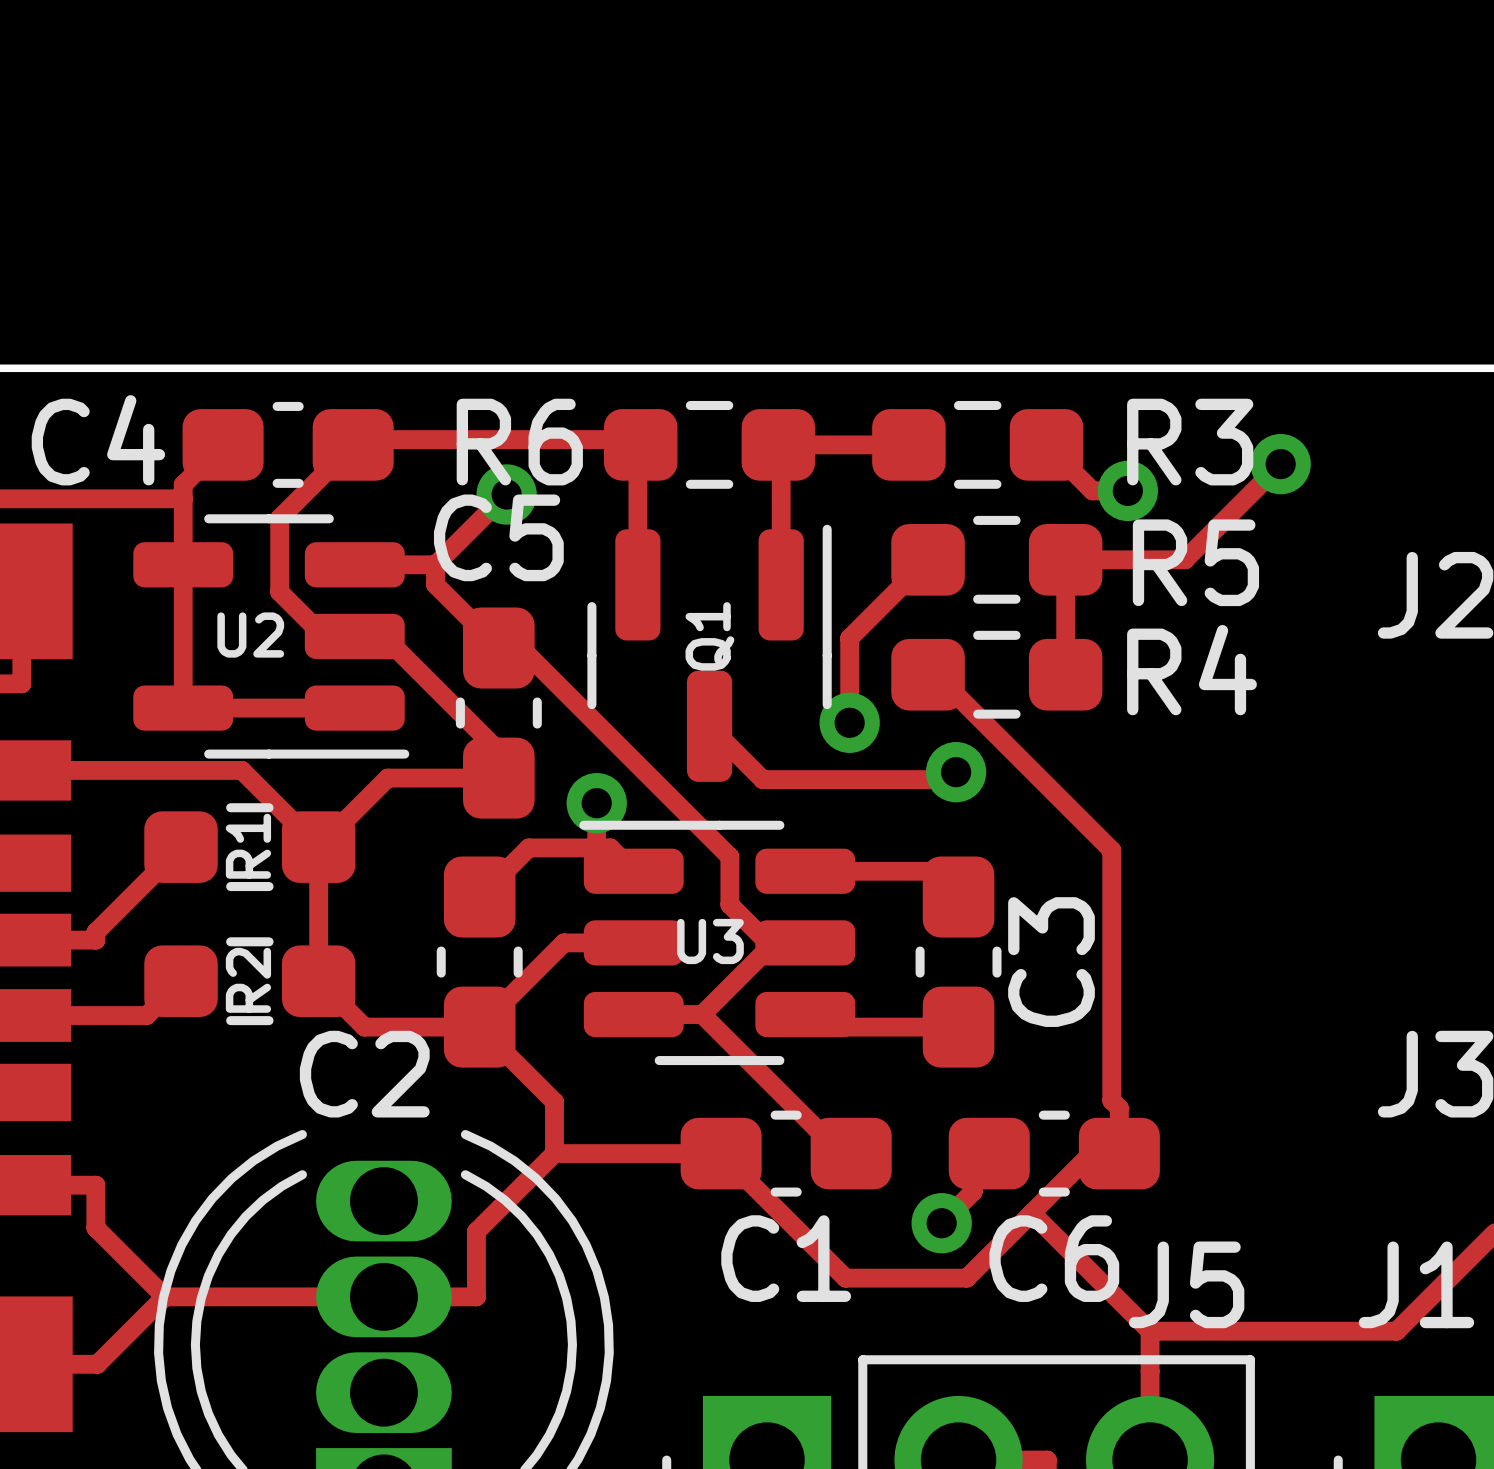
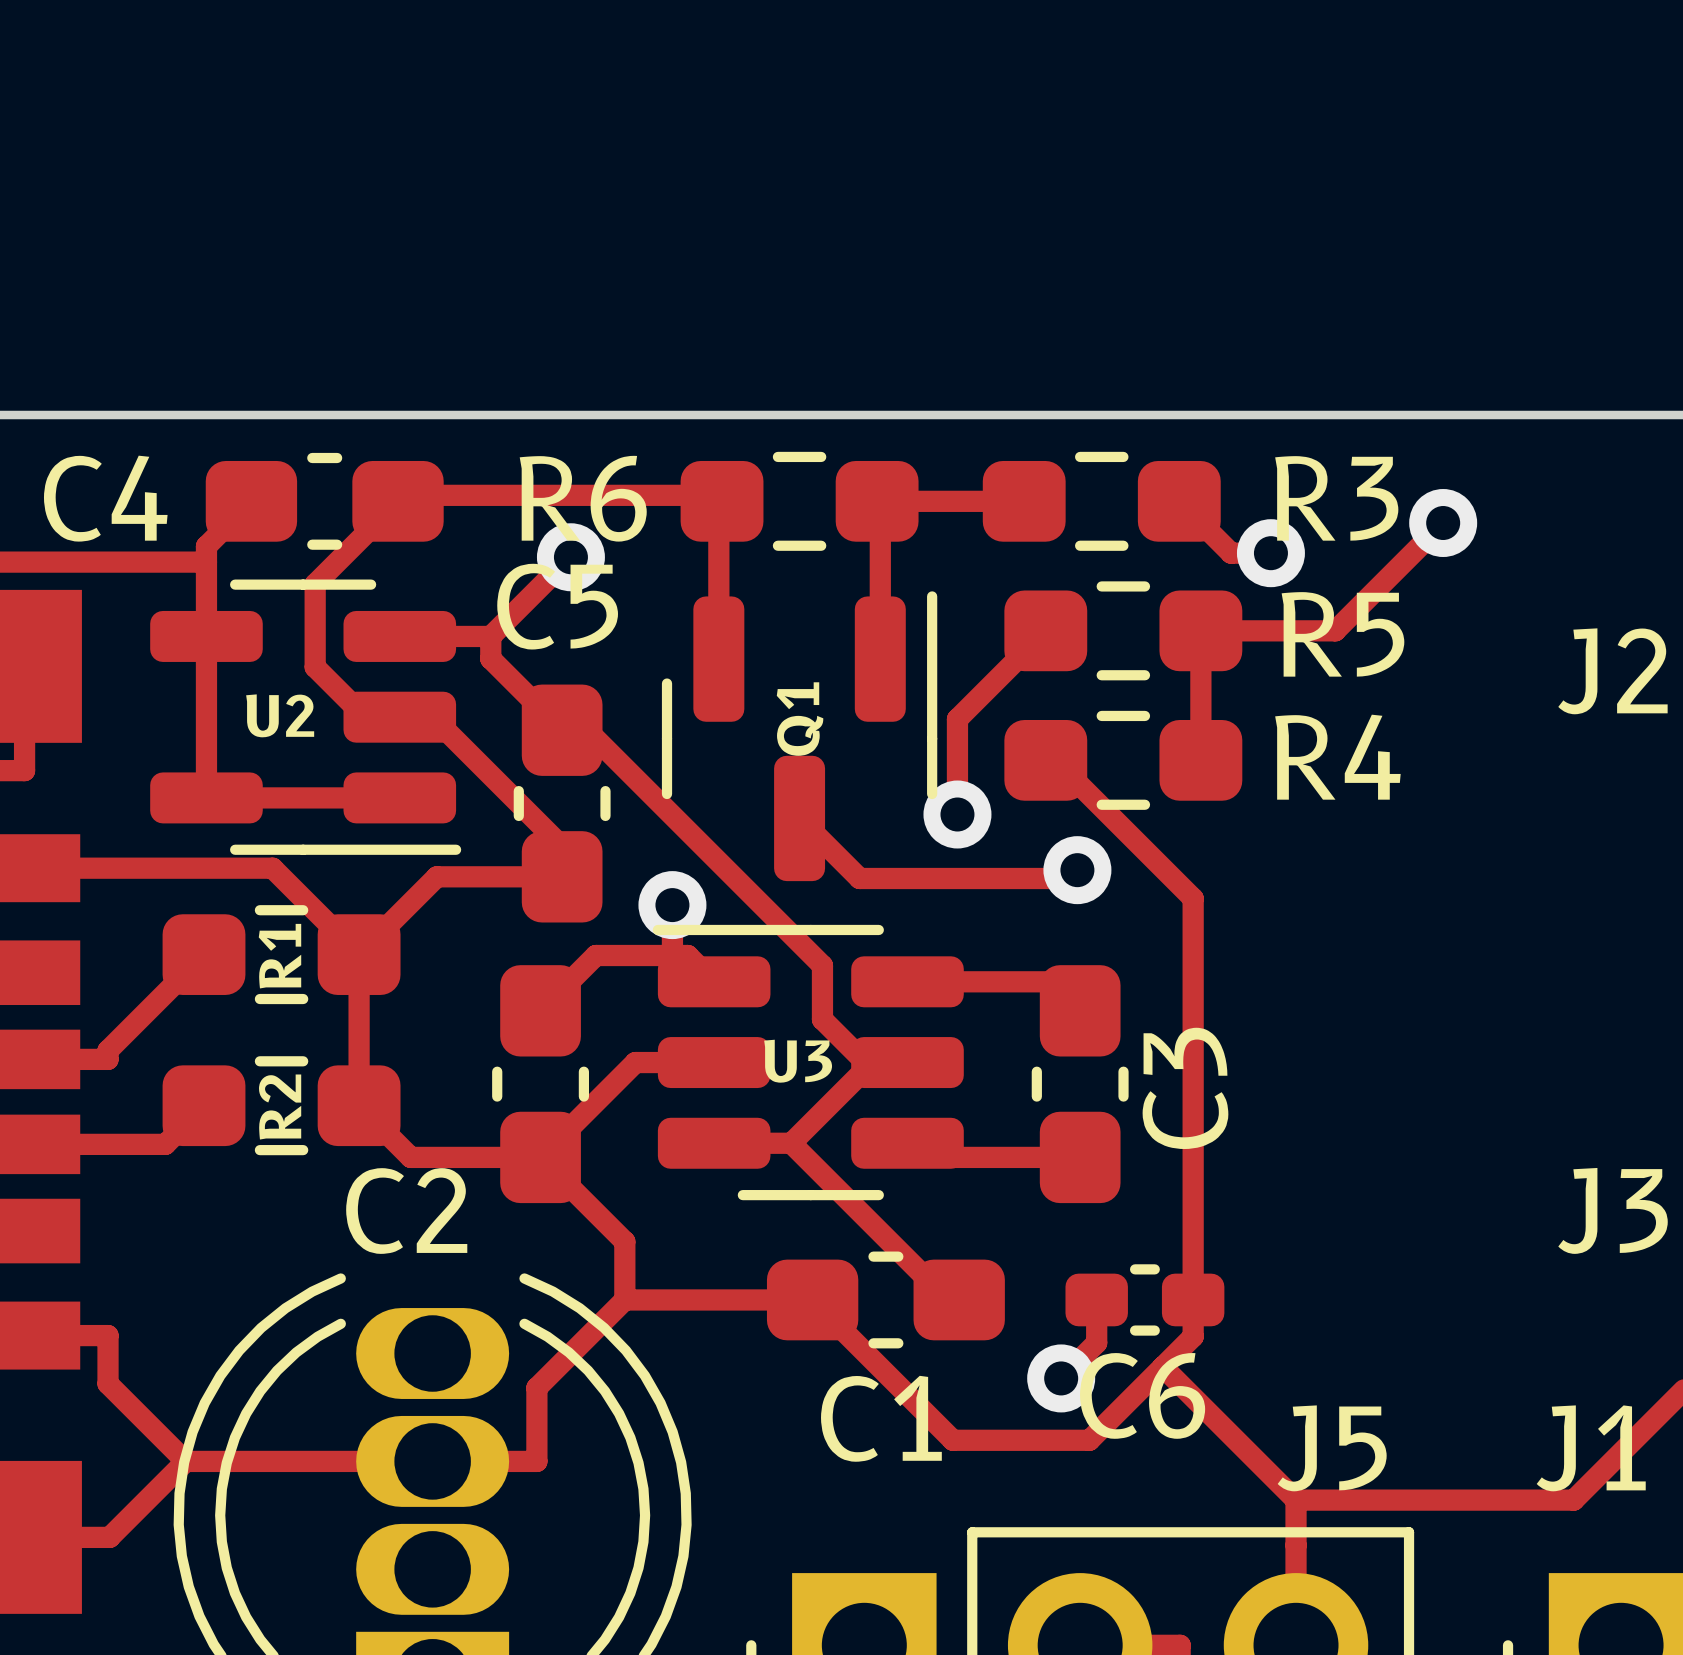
track: (1058, 797) (1111, 850) (1111, 1100) (1119, 1108) (1119, 1153) (1091, 1153) (1058, 1186) -> (1193, 898) (1193, 1336)
C6 footprint: [948, 1110, 1160, 1197] -> [1065, 1264, 1225, 1336]
C6 name position: C6 (1054, 1258) -> C6 (1142, 1395)

